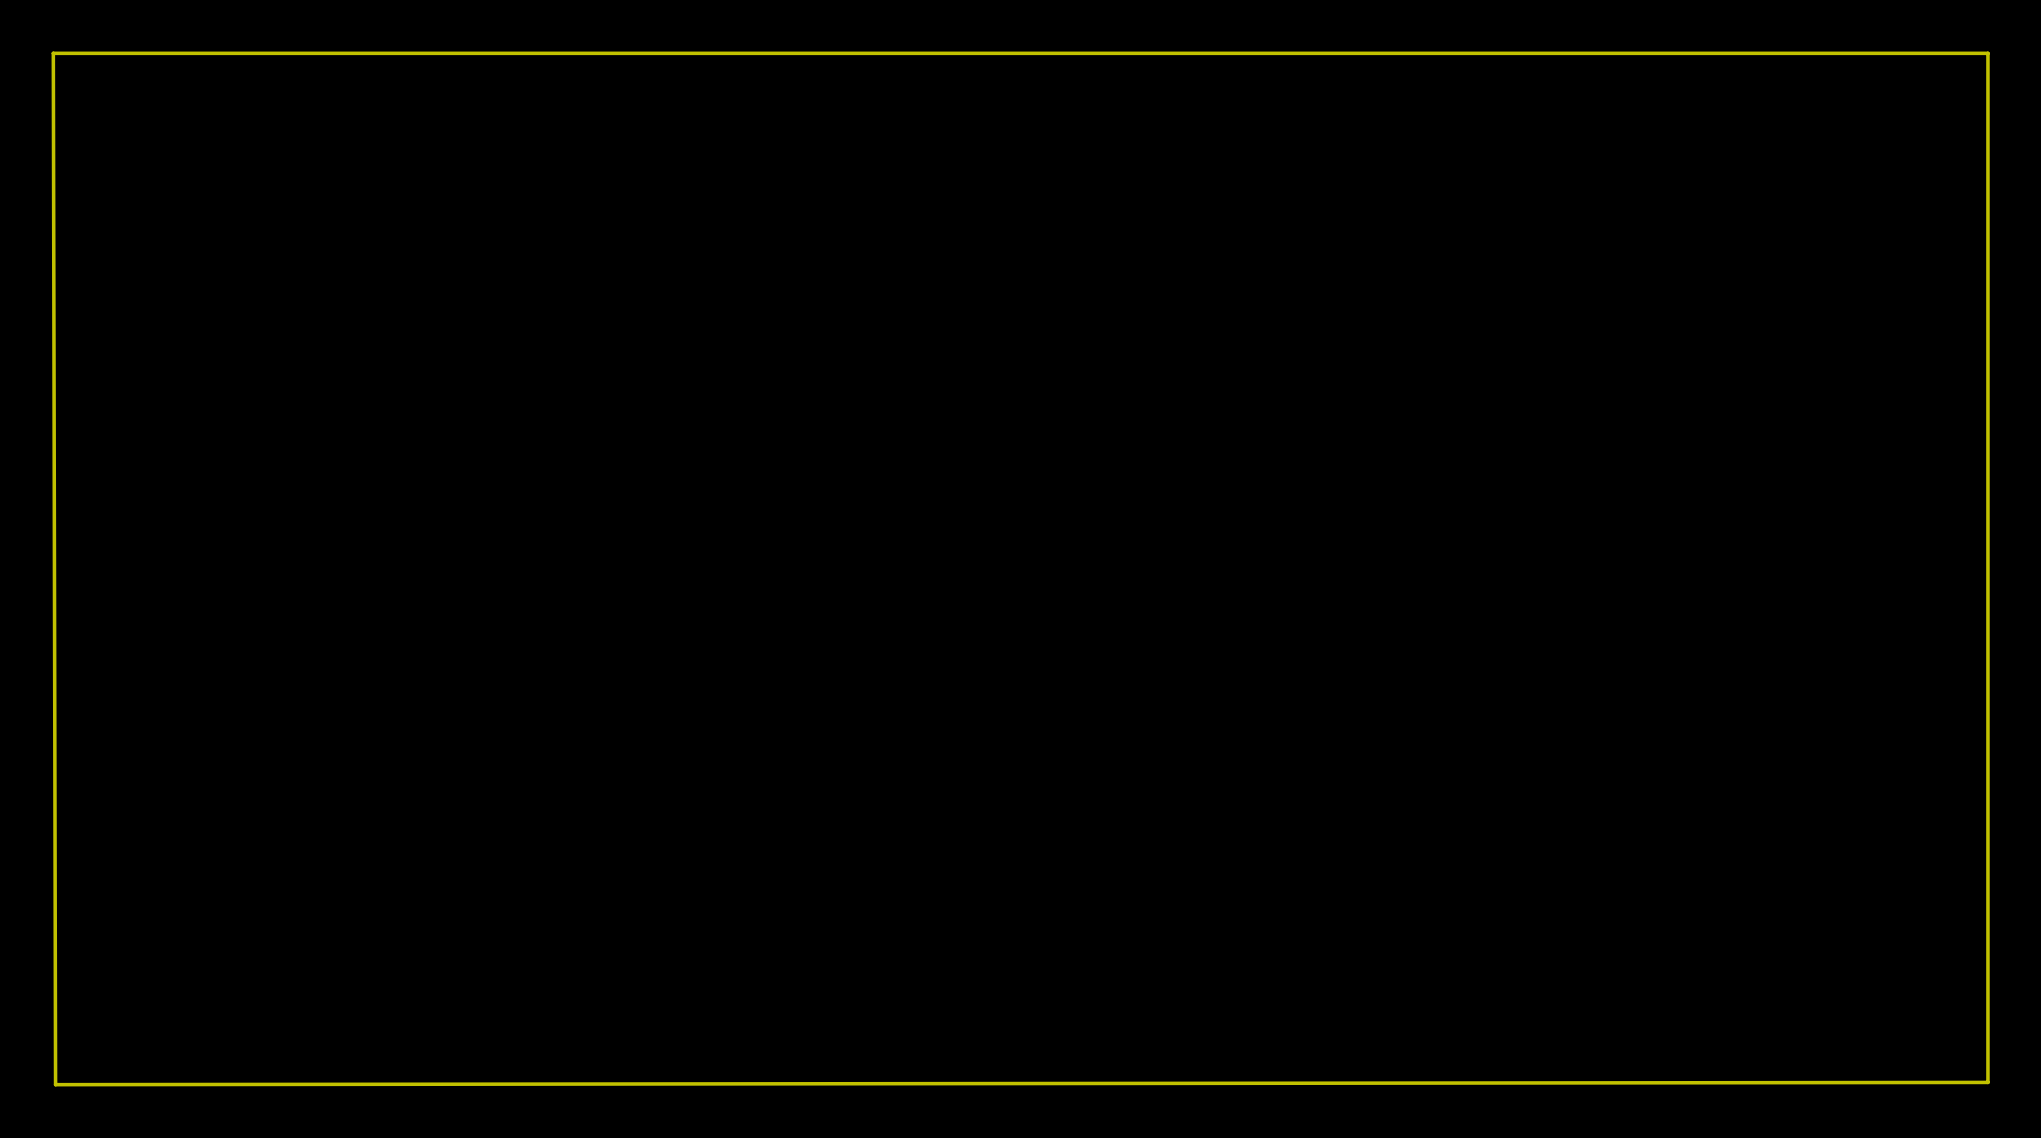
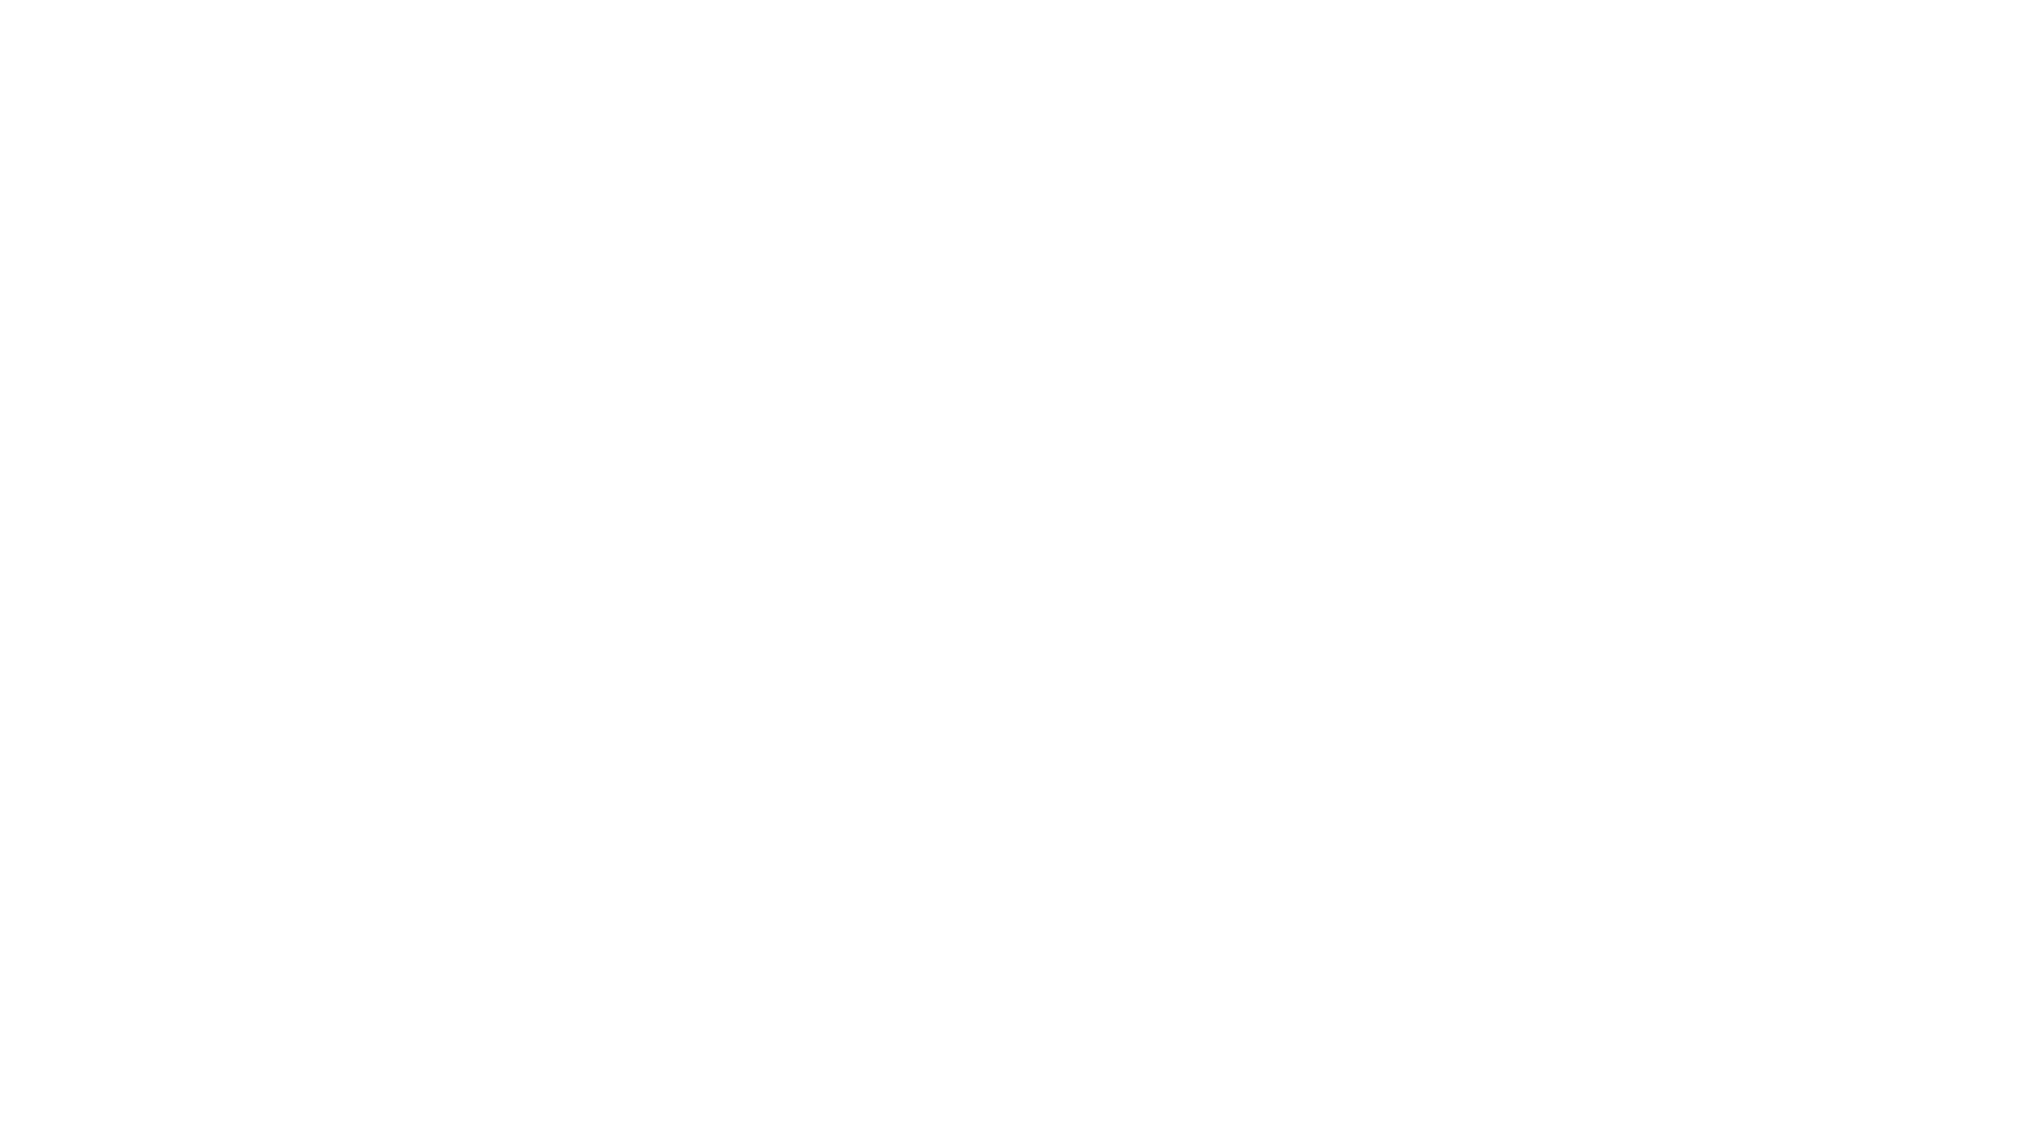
board edge: (53, 53) (55, 1084) (1987, 1082) (1987, 53) (53, 53) -> none

